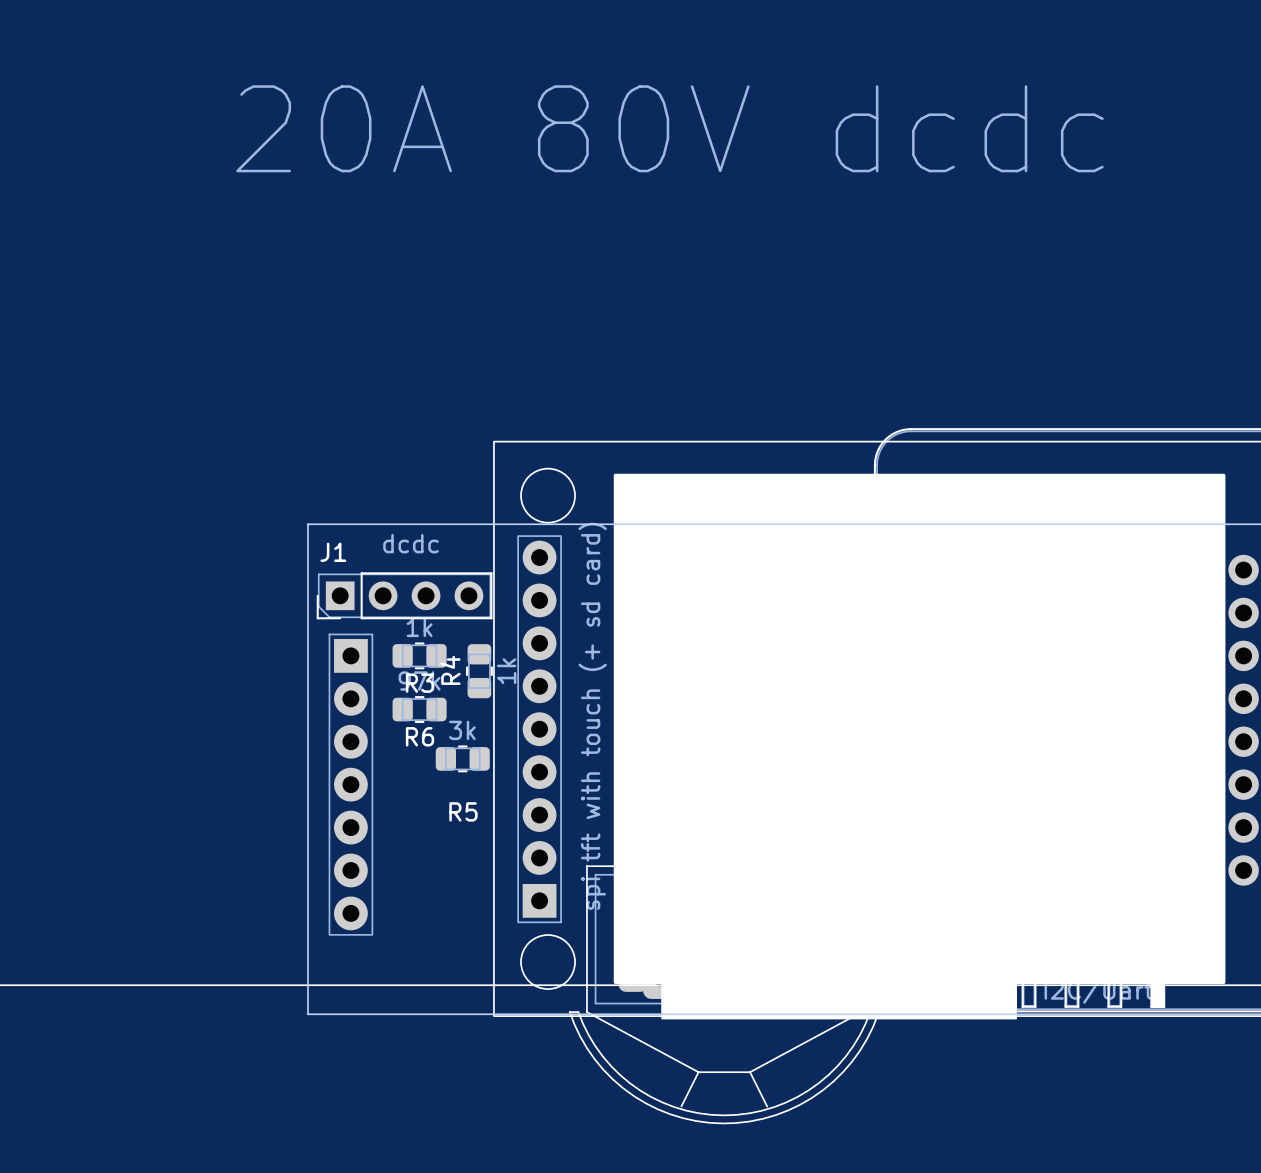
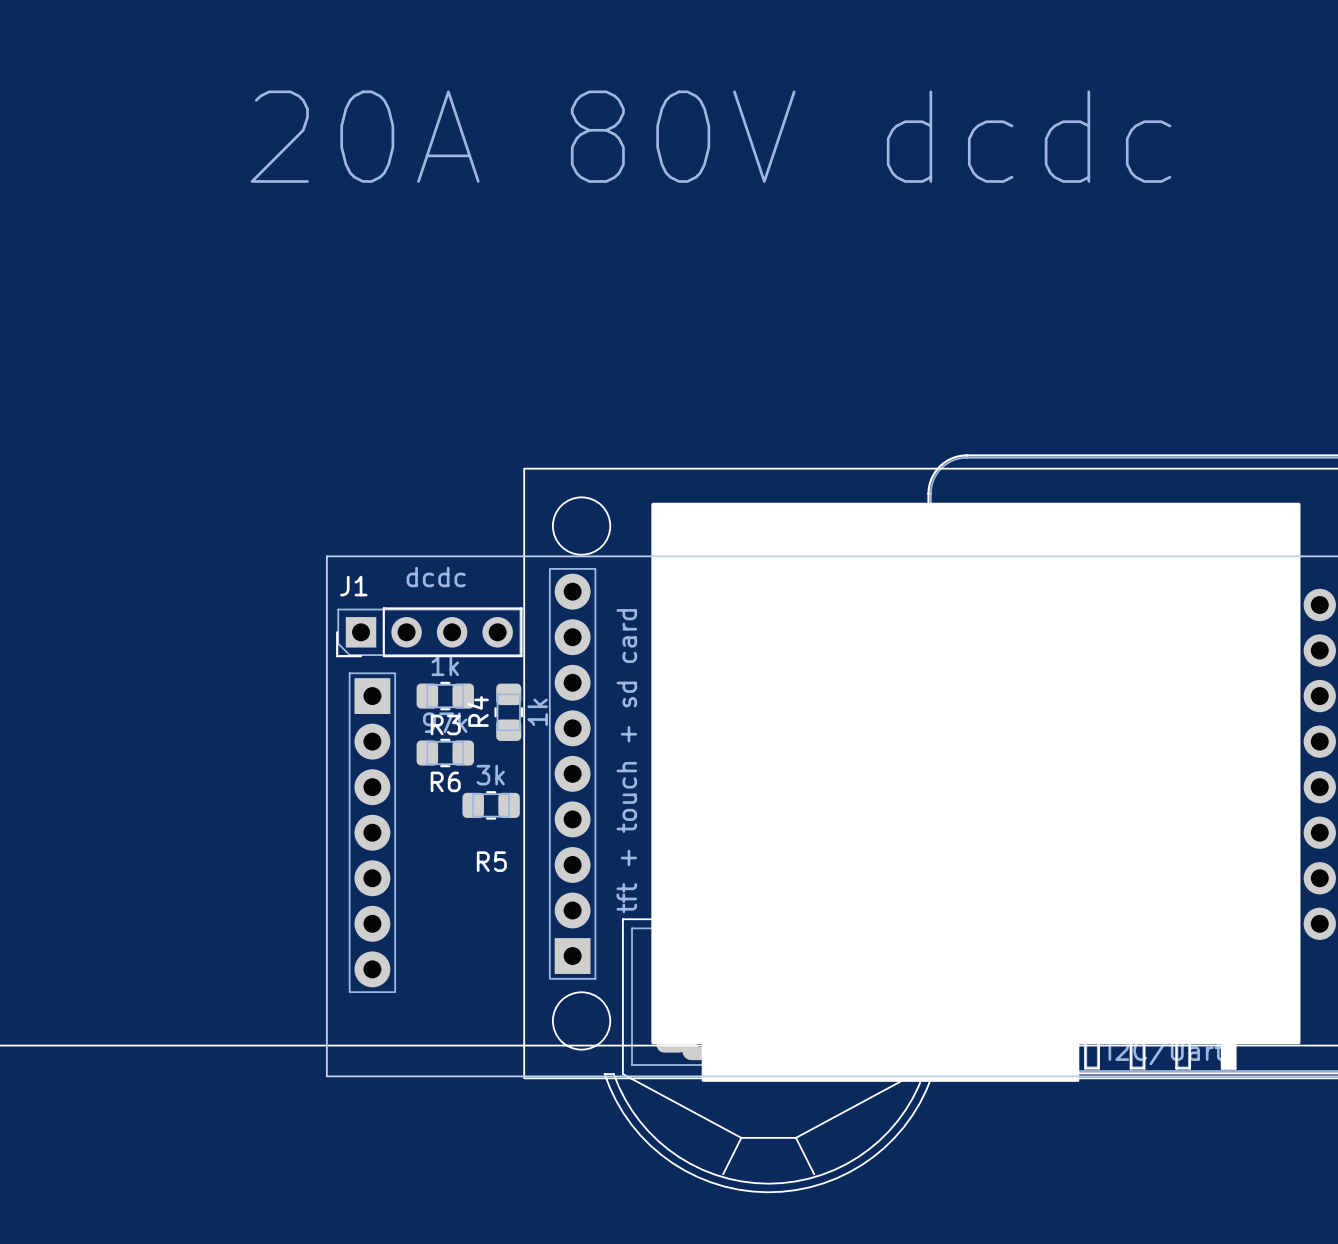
part value: spi tft with touch (+ sd card) (592, 716) -> tft + touch + sd card (626, 761)

